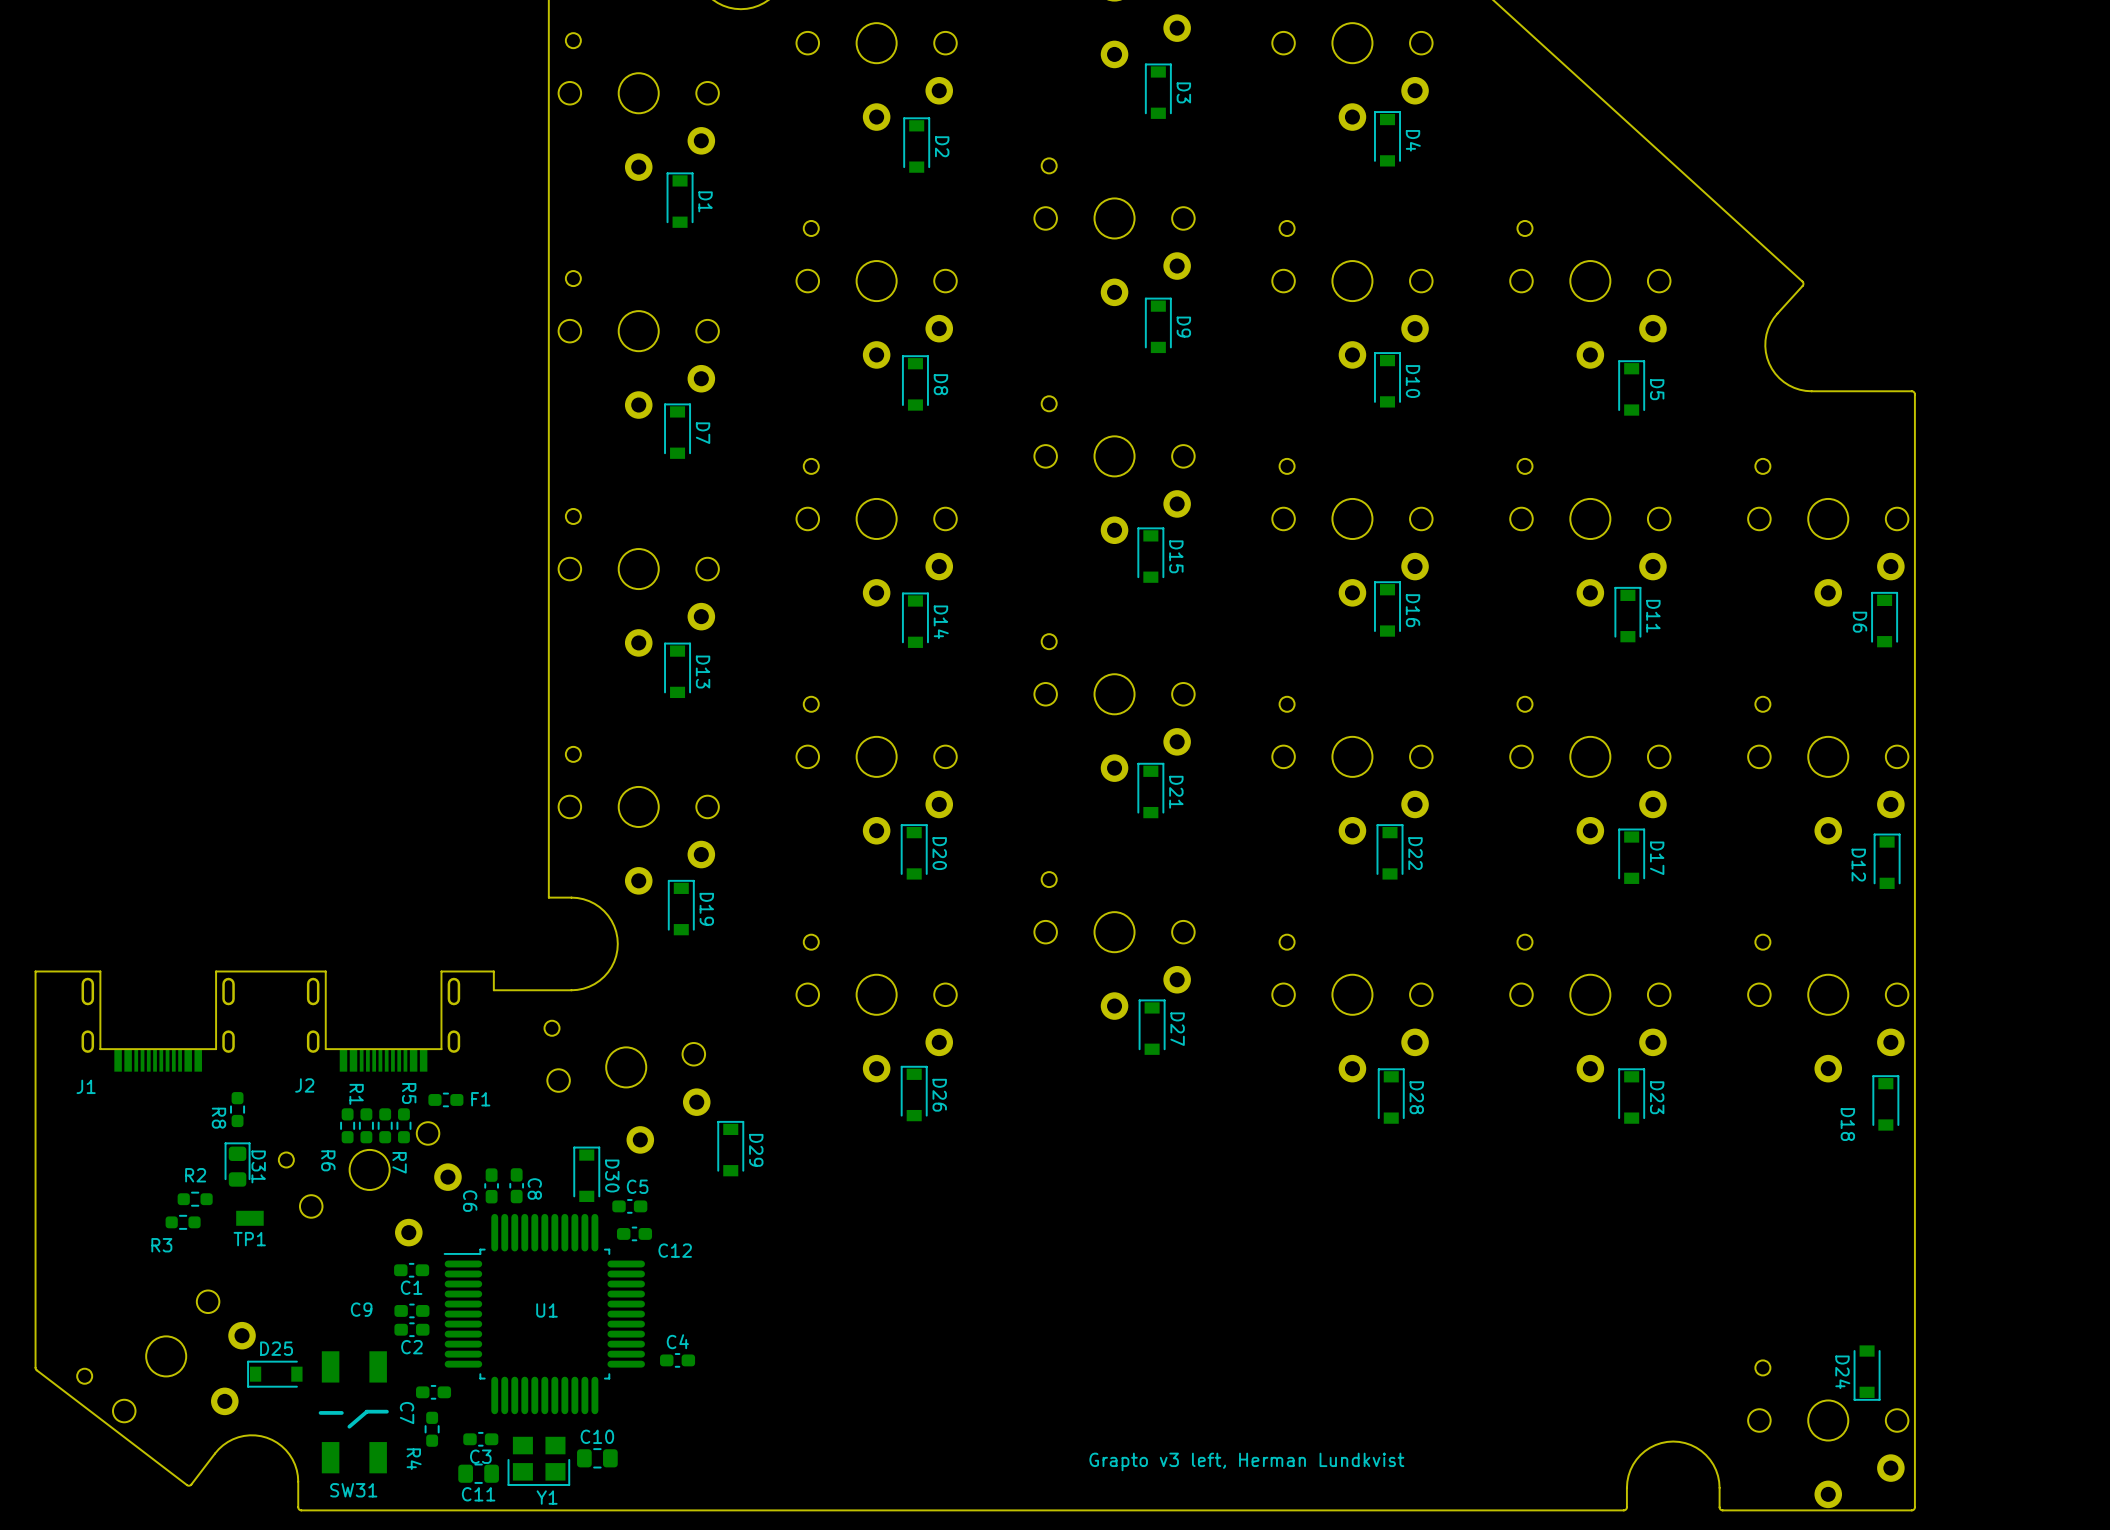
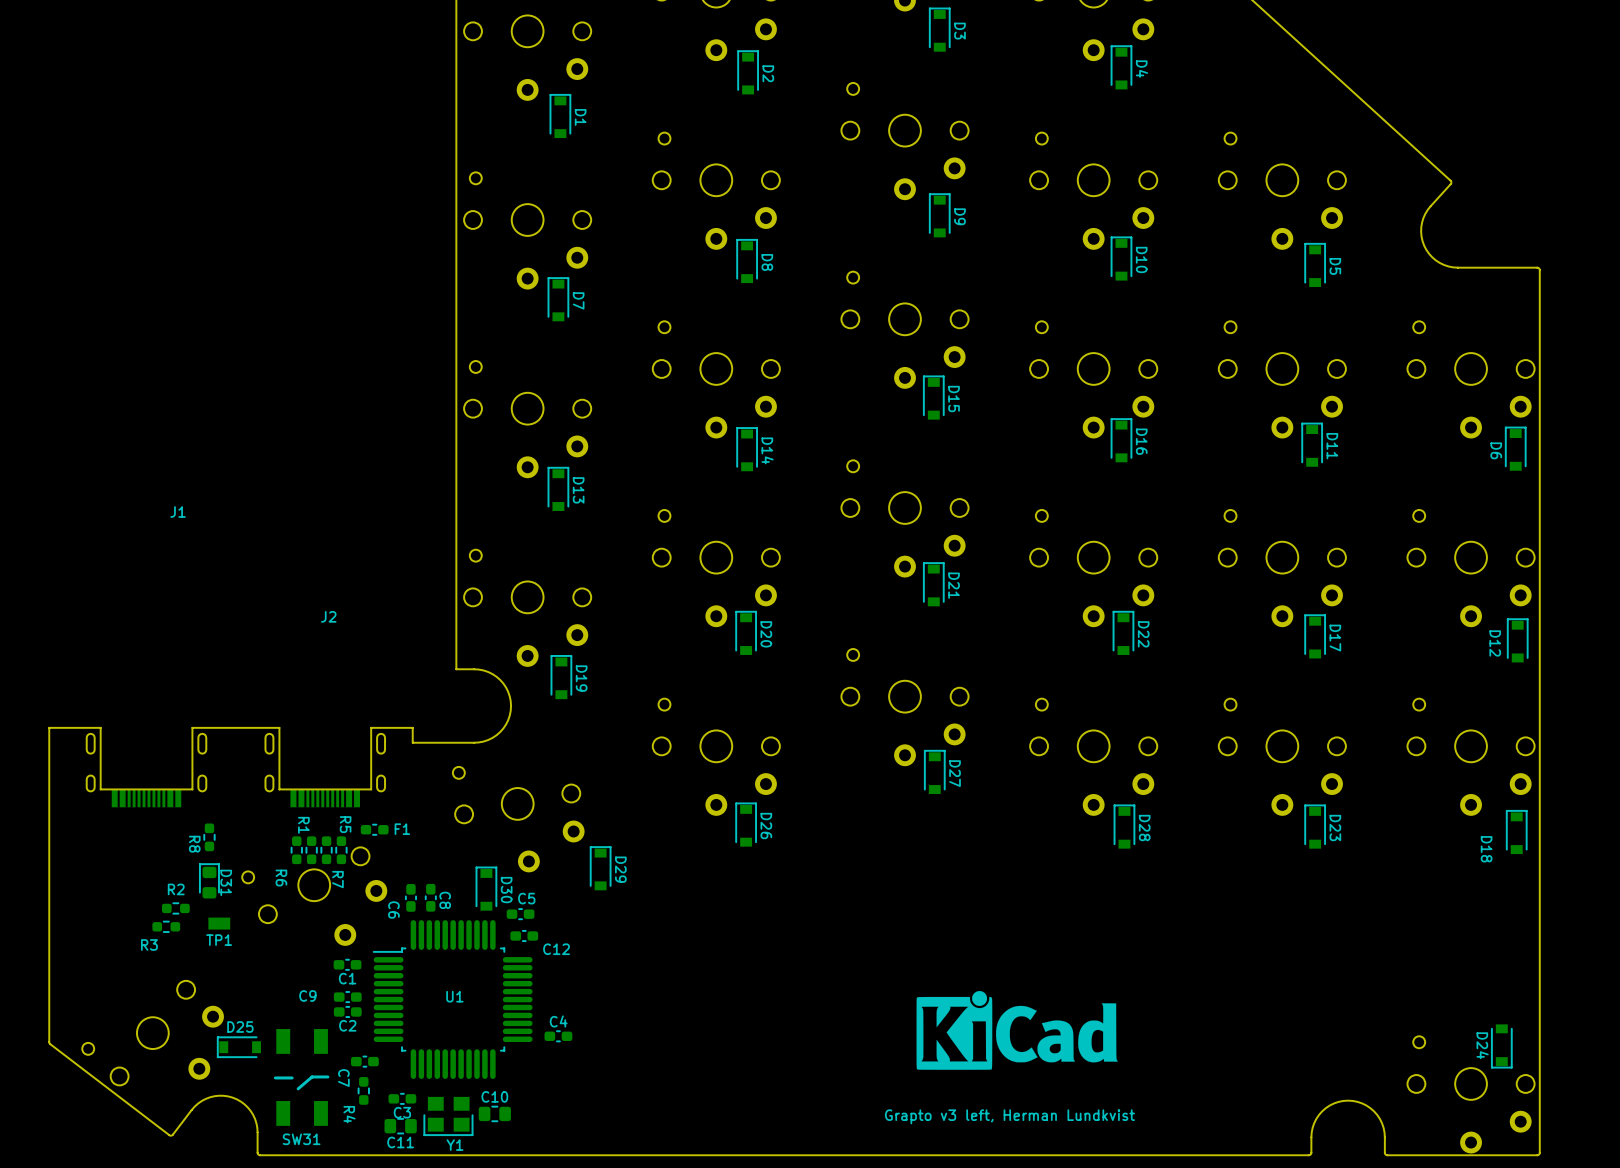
J2 name position: J2 (304, 1085) -> J2 (328, 616)
J1 name position: J1 (86, 1086) -> J1 (178, 511)
drawing: none -> [916, 991, 1118, 1070]

